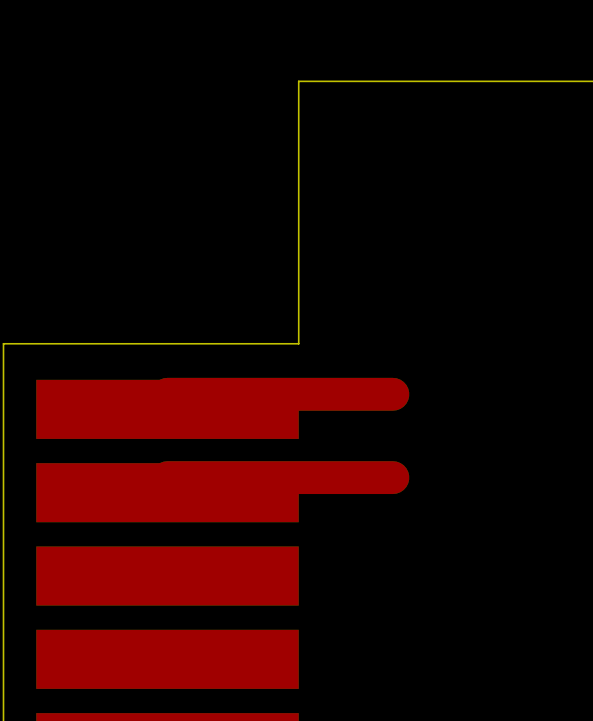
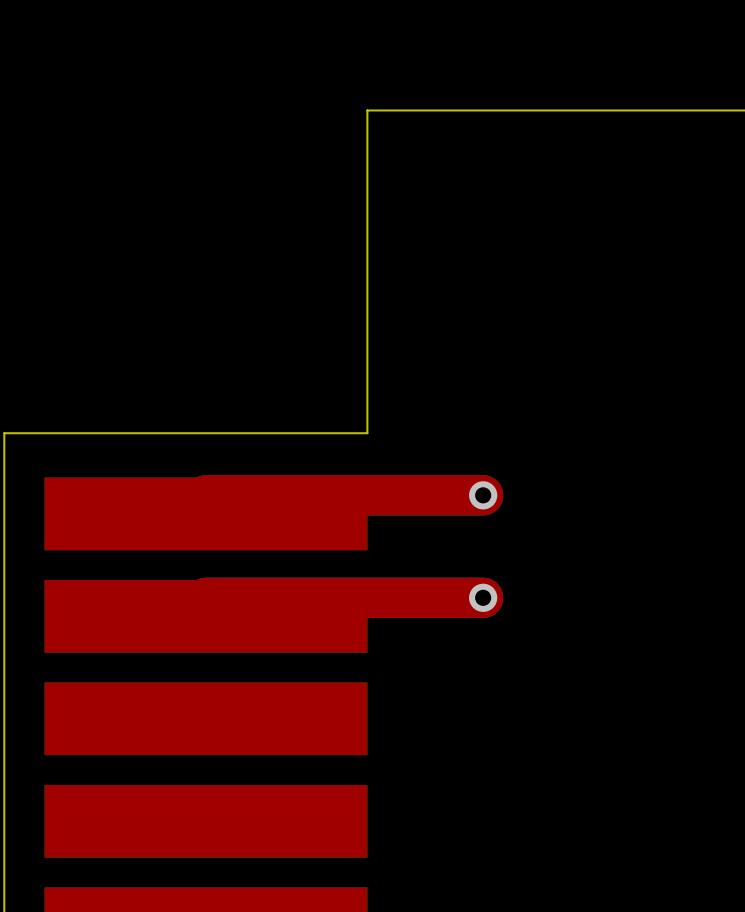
via: none -> (483, 495)
via: none -> (483, 597)

